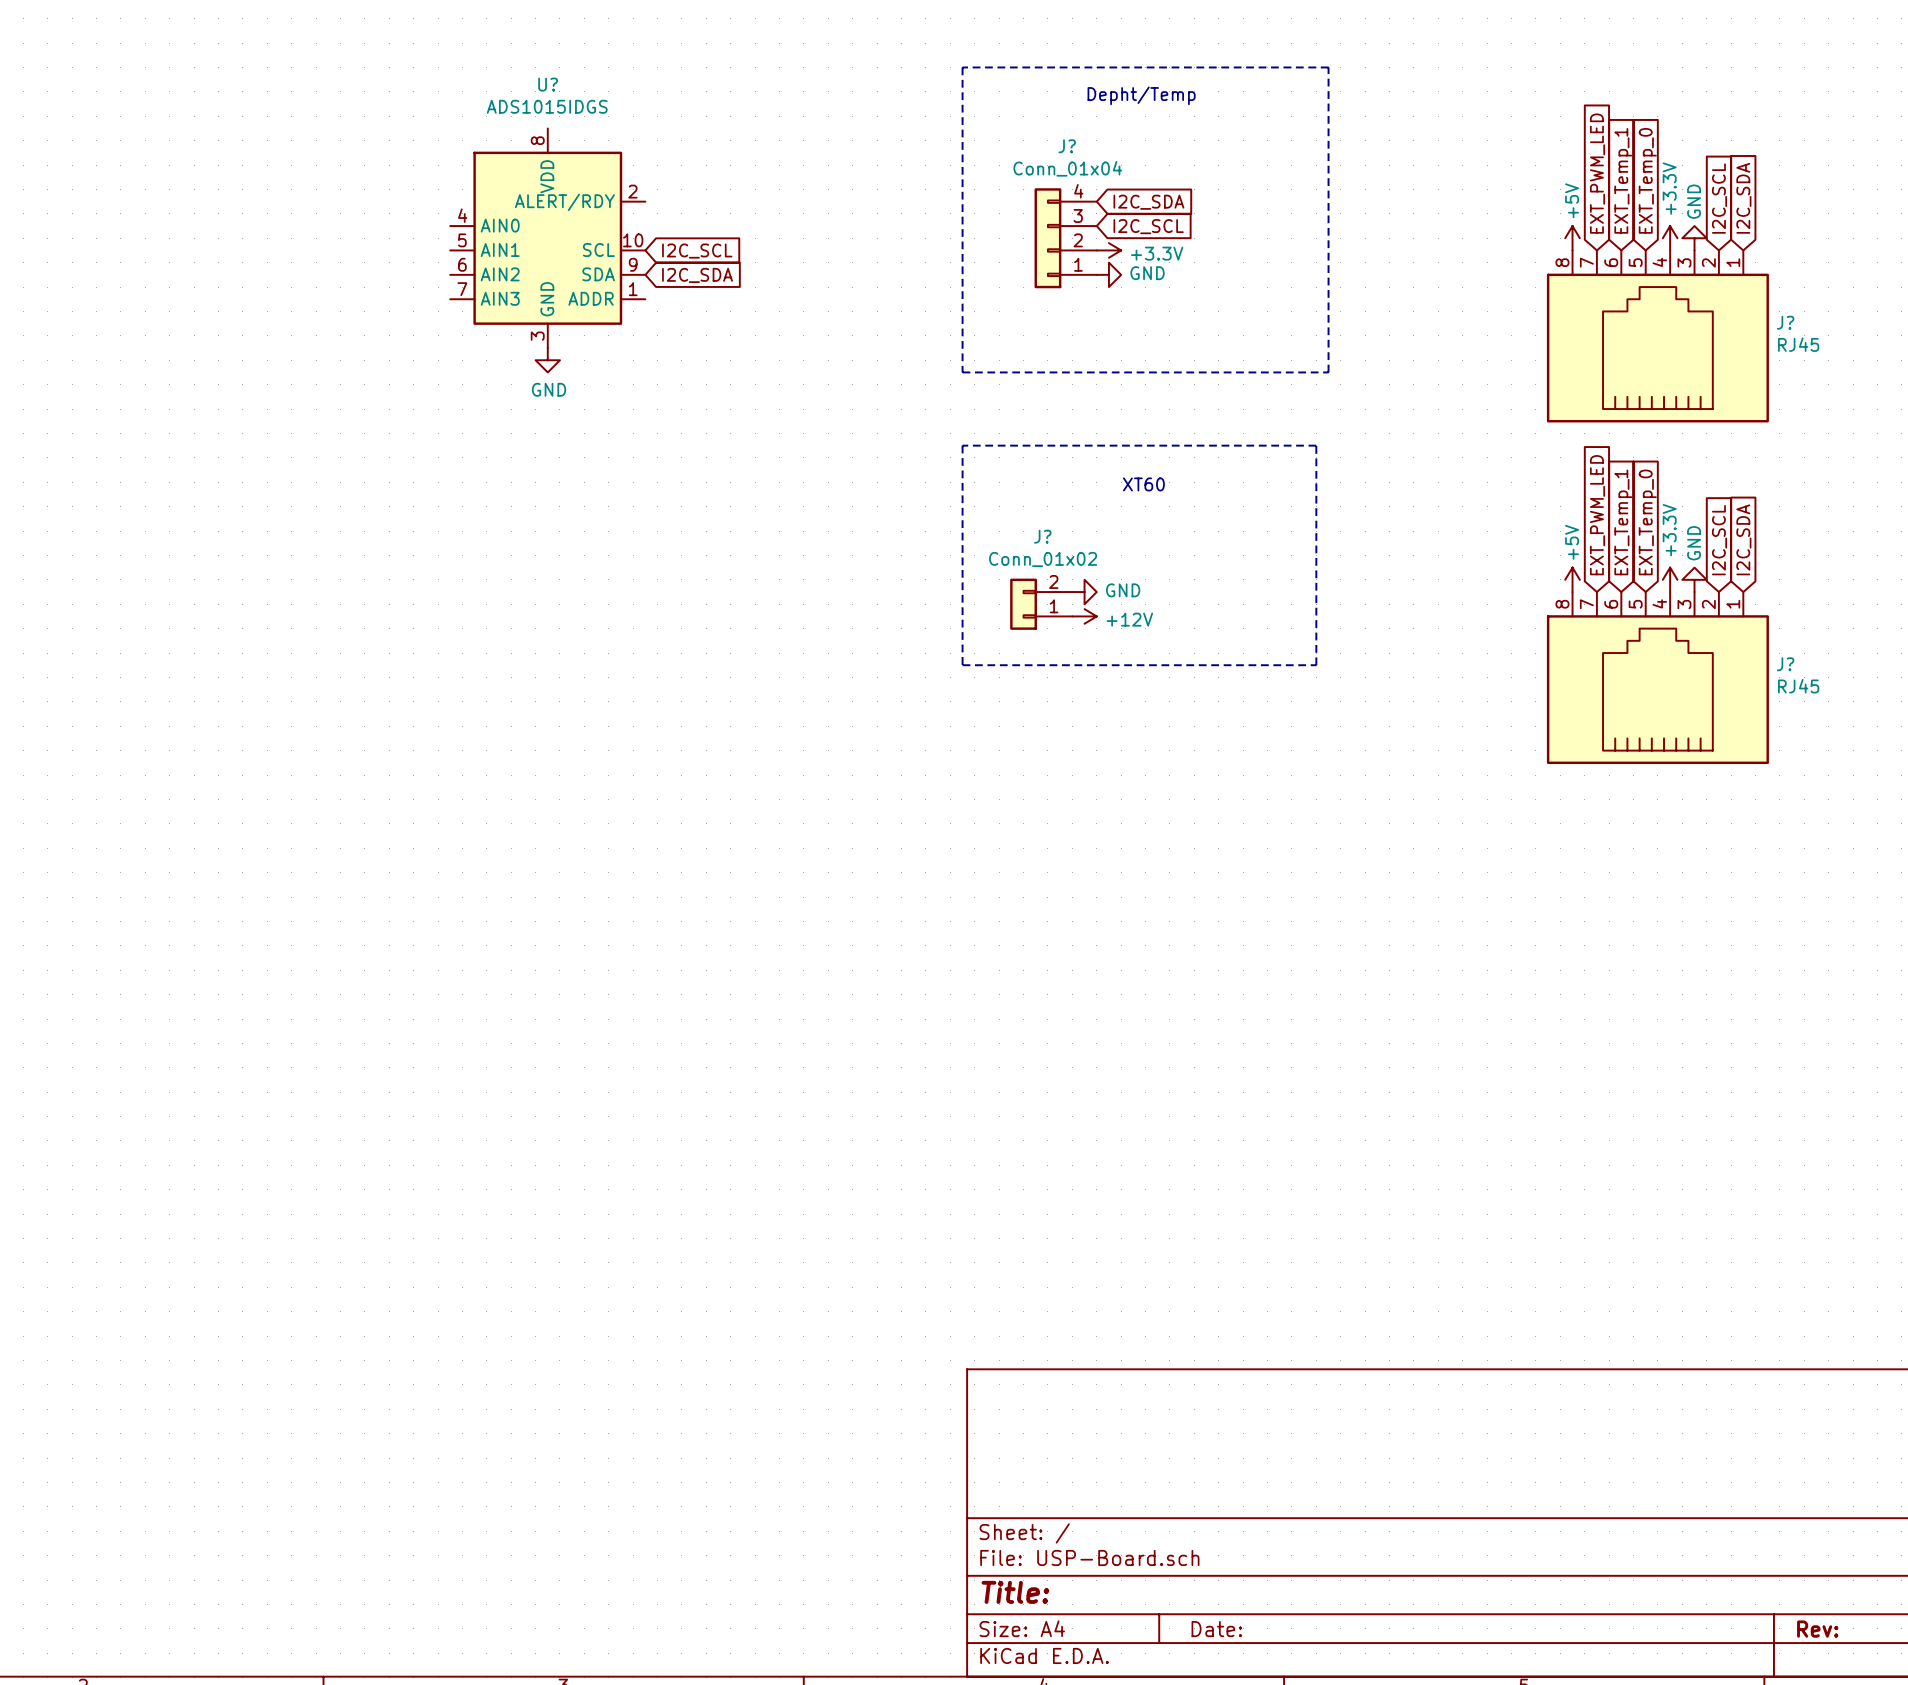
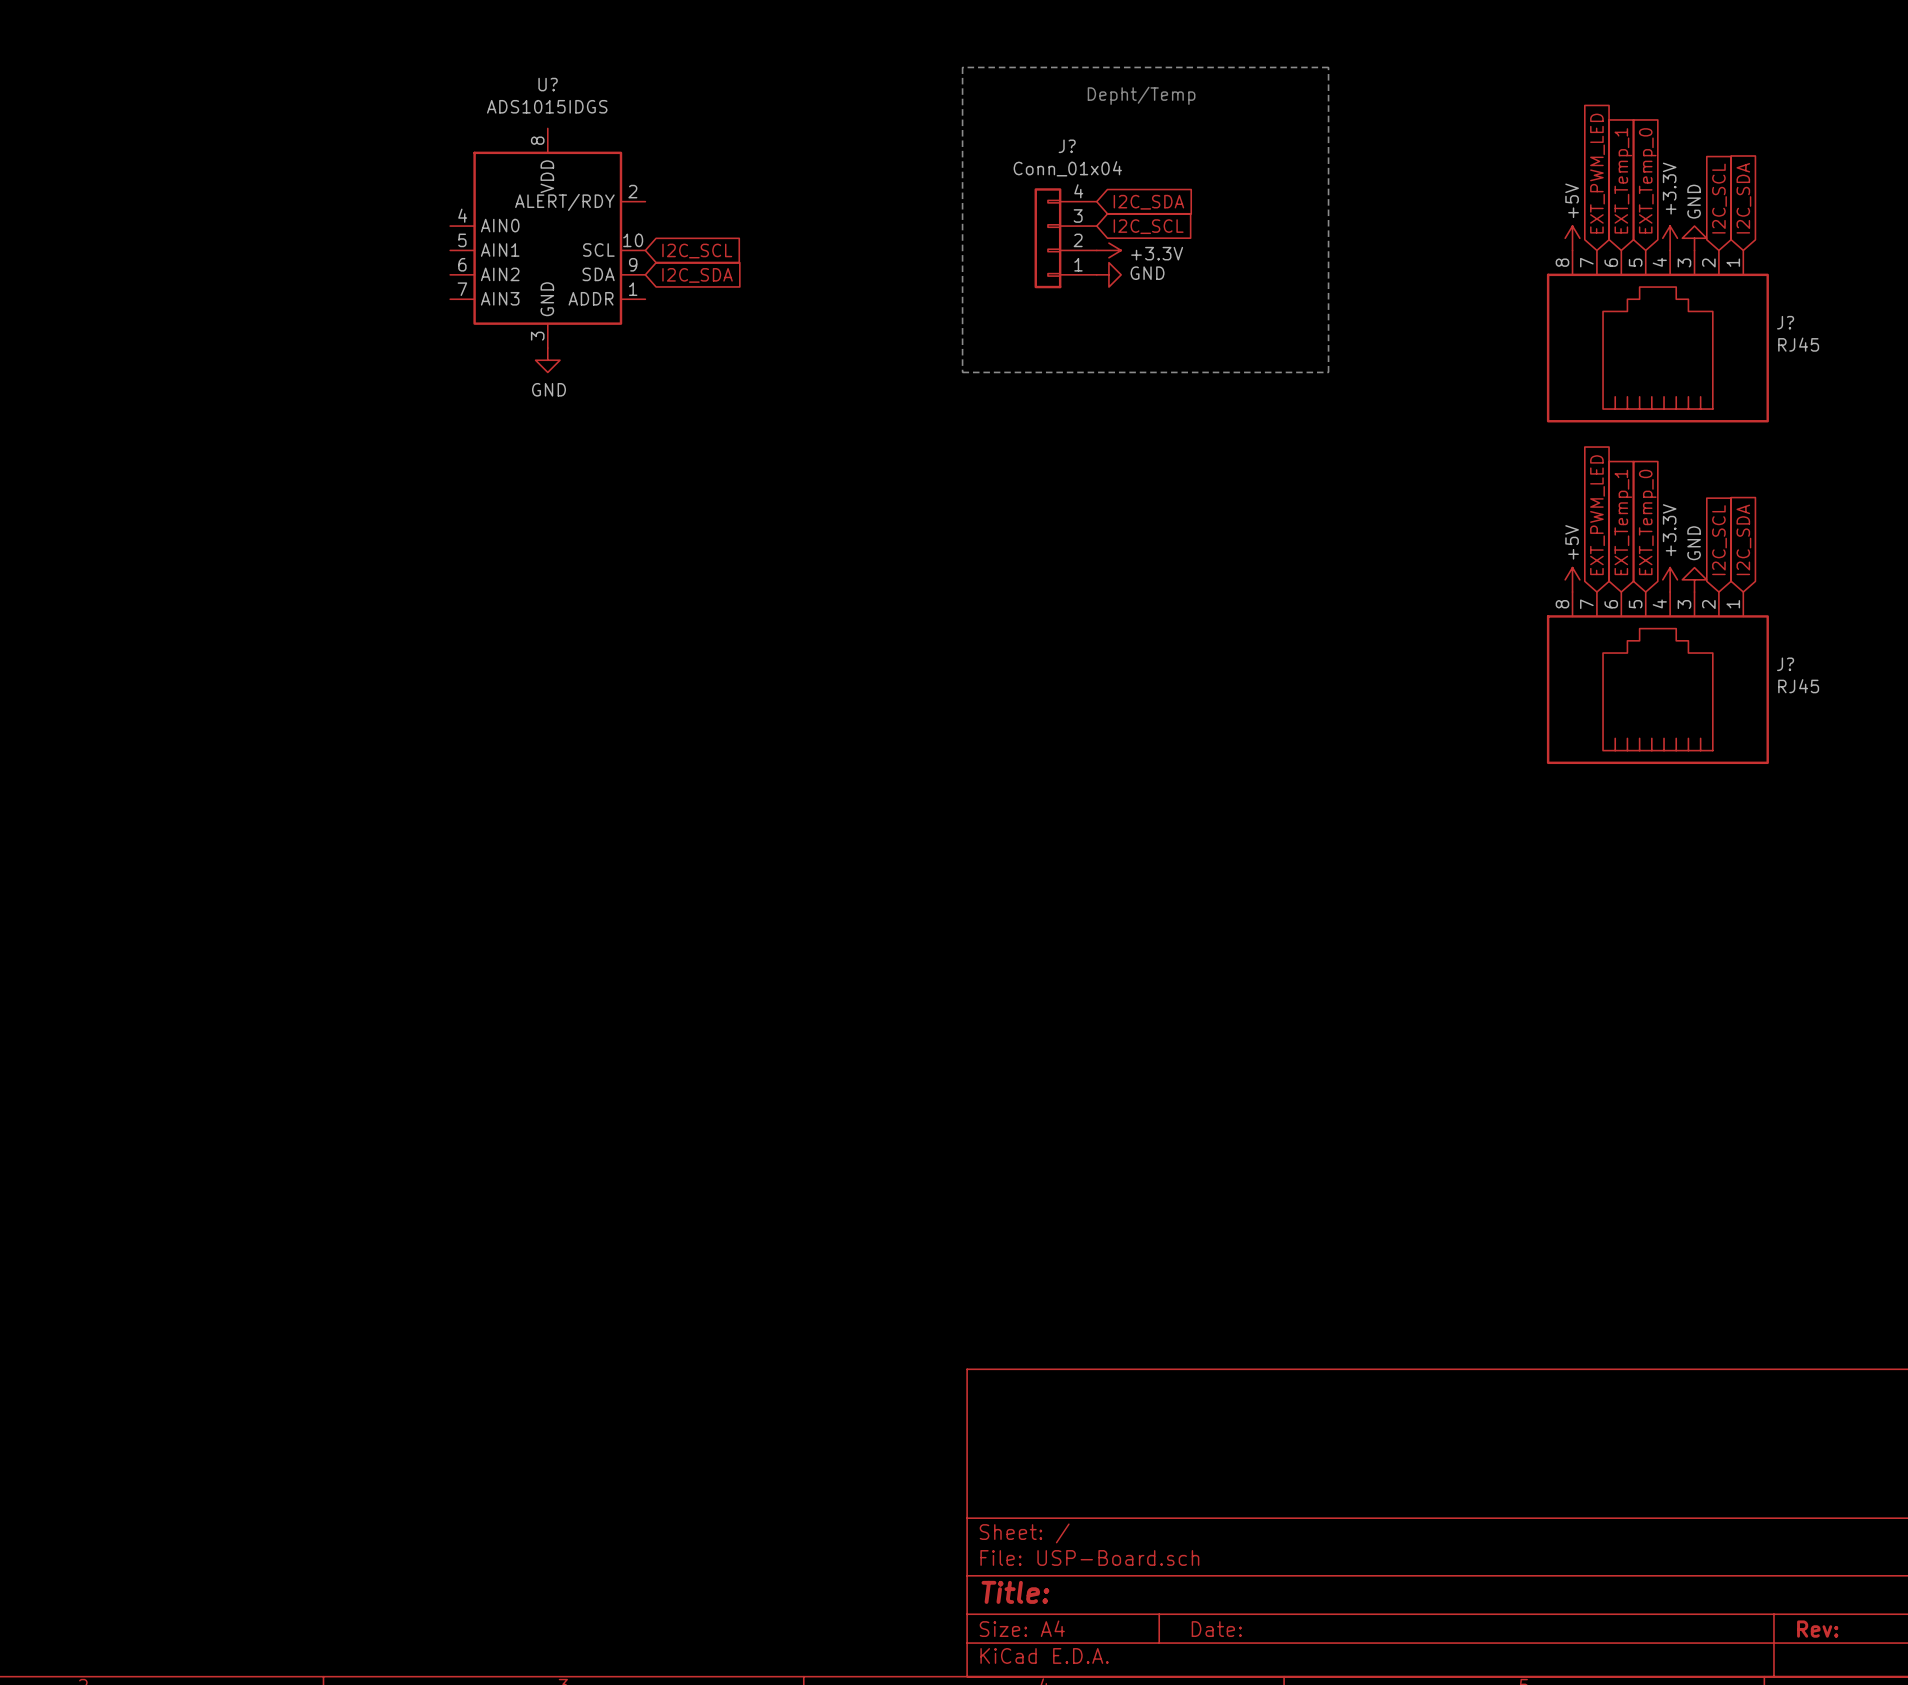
line: (962, 445) (1316, 445) (1316, 665) (962, 665) (962, 445) -> none
text: XT60 (1143, 484) -> none
power symbol: GND (1084, 592) -> none
J?: Conn_01x02 (1041, 604) -> none
power symbol: +12V (1084, 616) -> none

